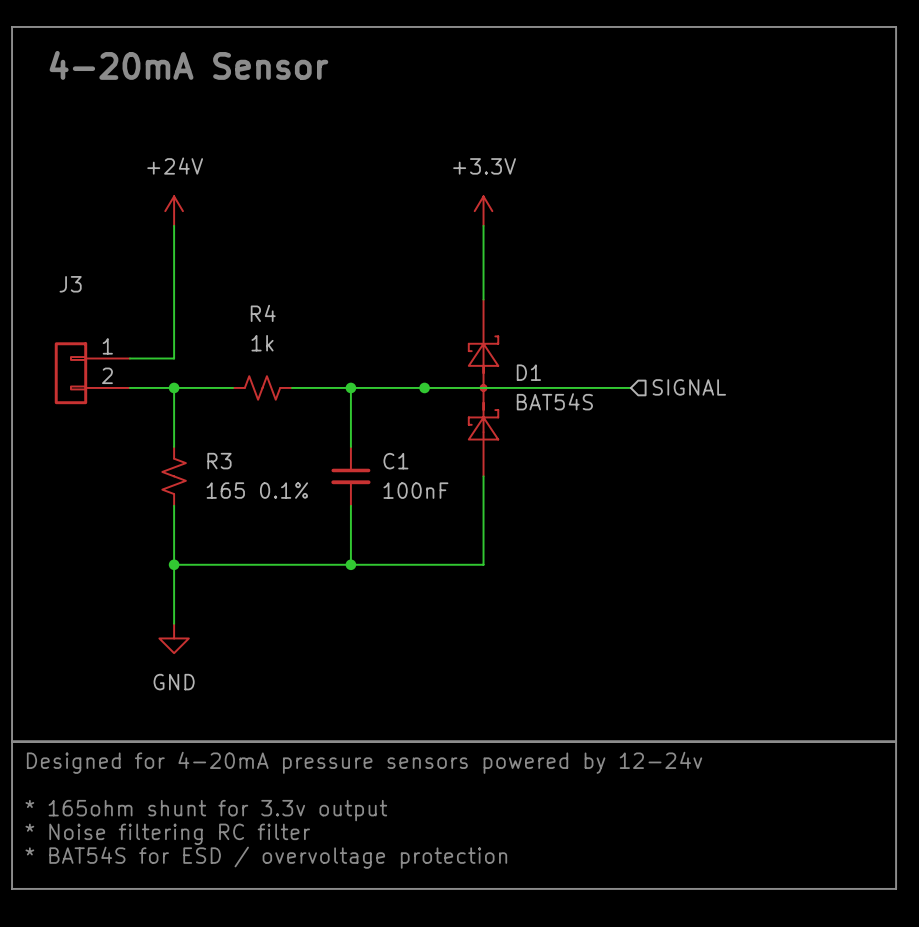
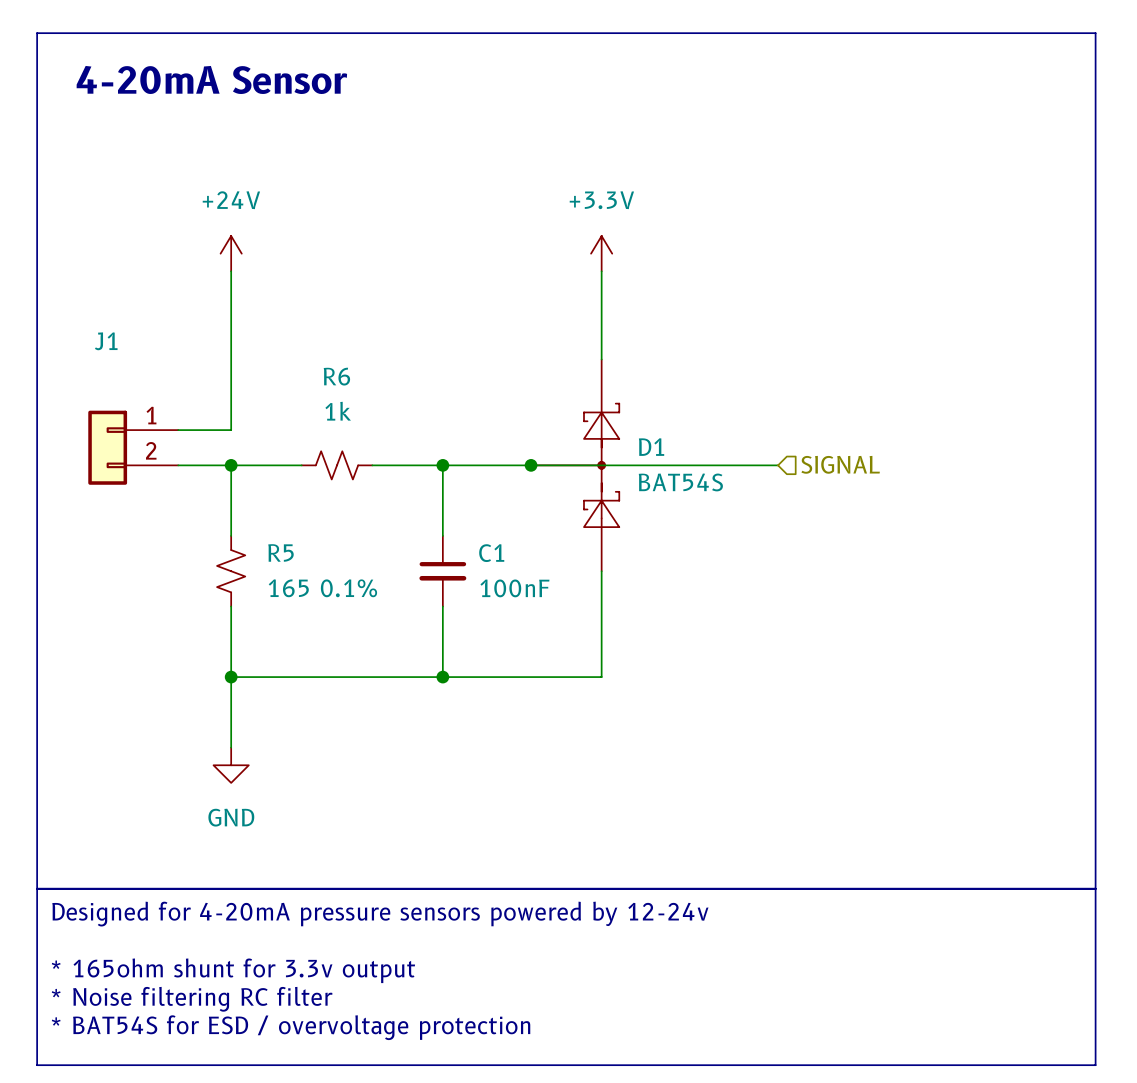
J3 name: J3 (70, 284) -> J1 (106, 341)
R4 name: R4 (263, 313) -> R6 (336, 376)
R3 name: R3 (219, 461) -> R5 (280, 552)

